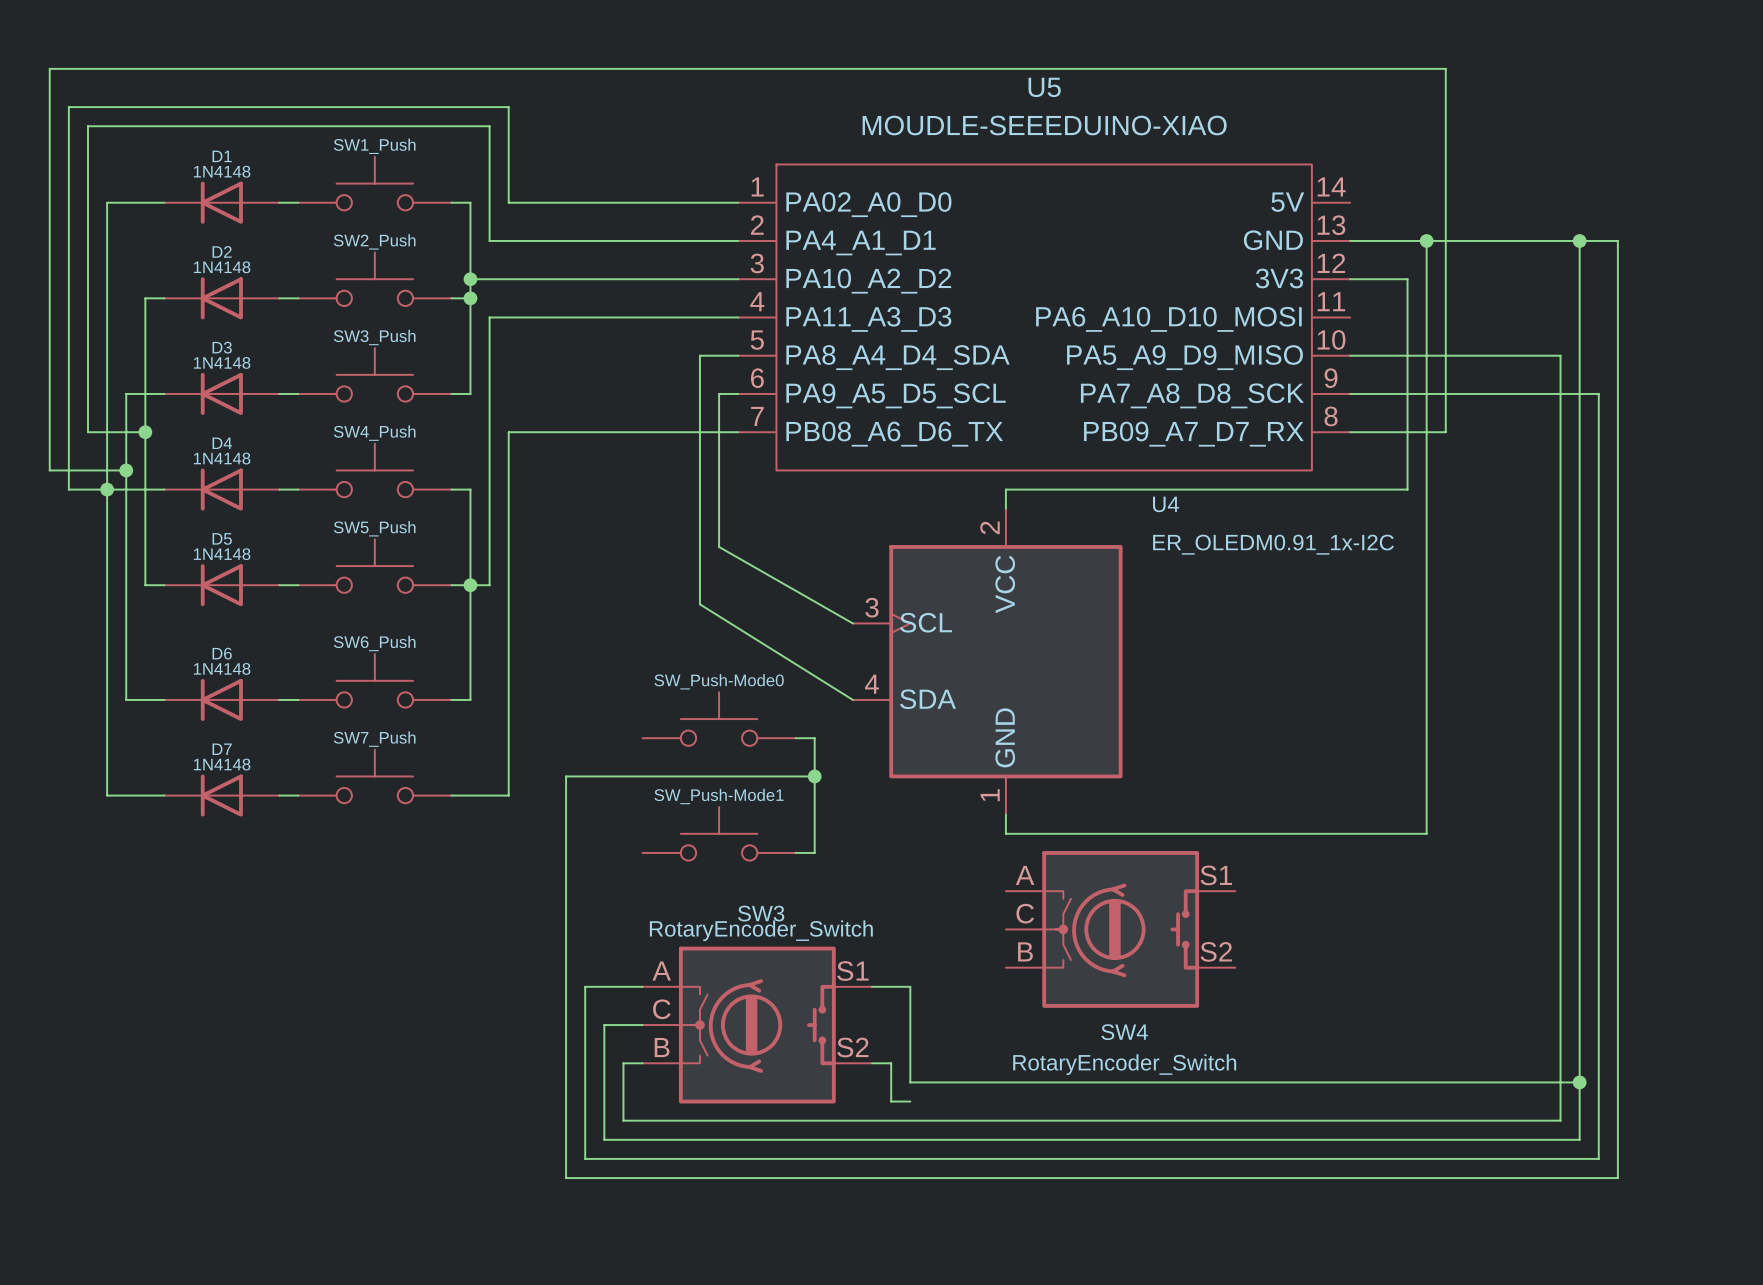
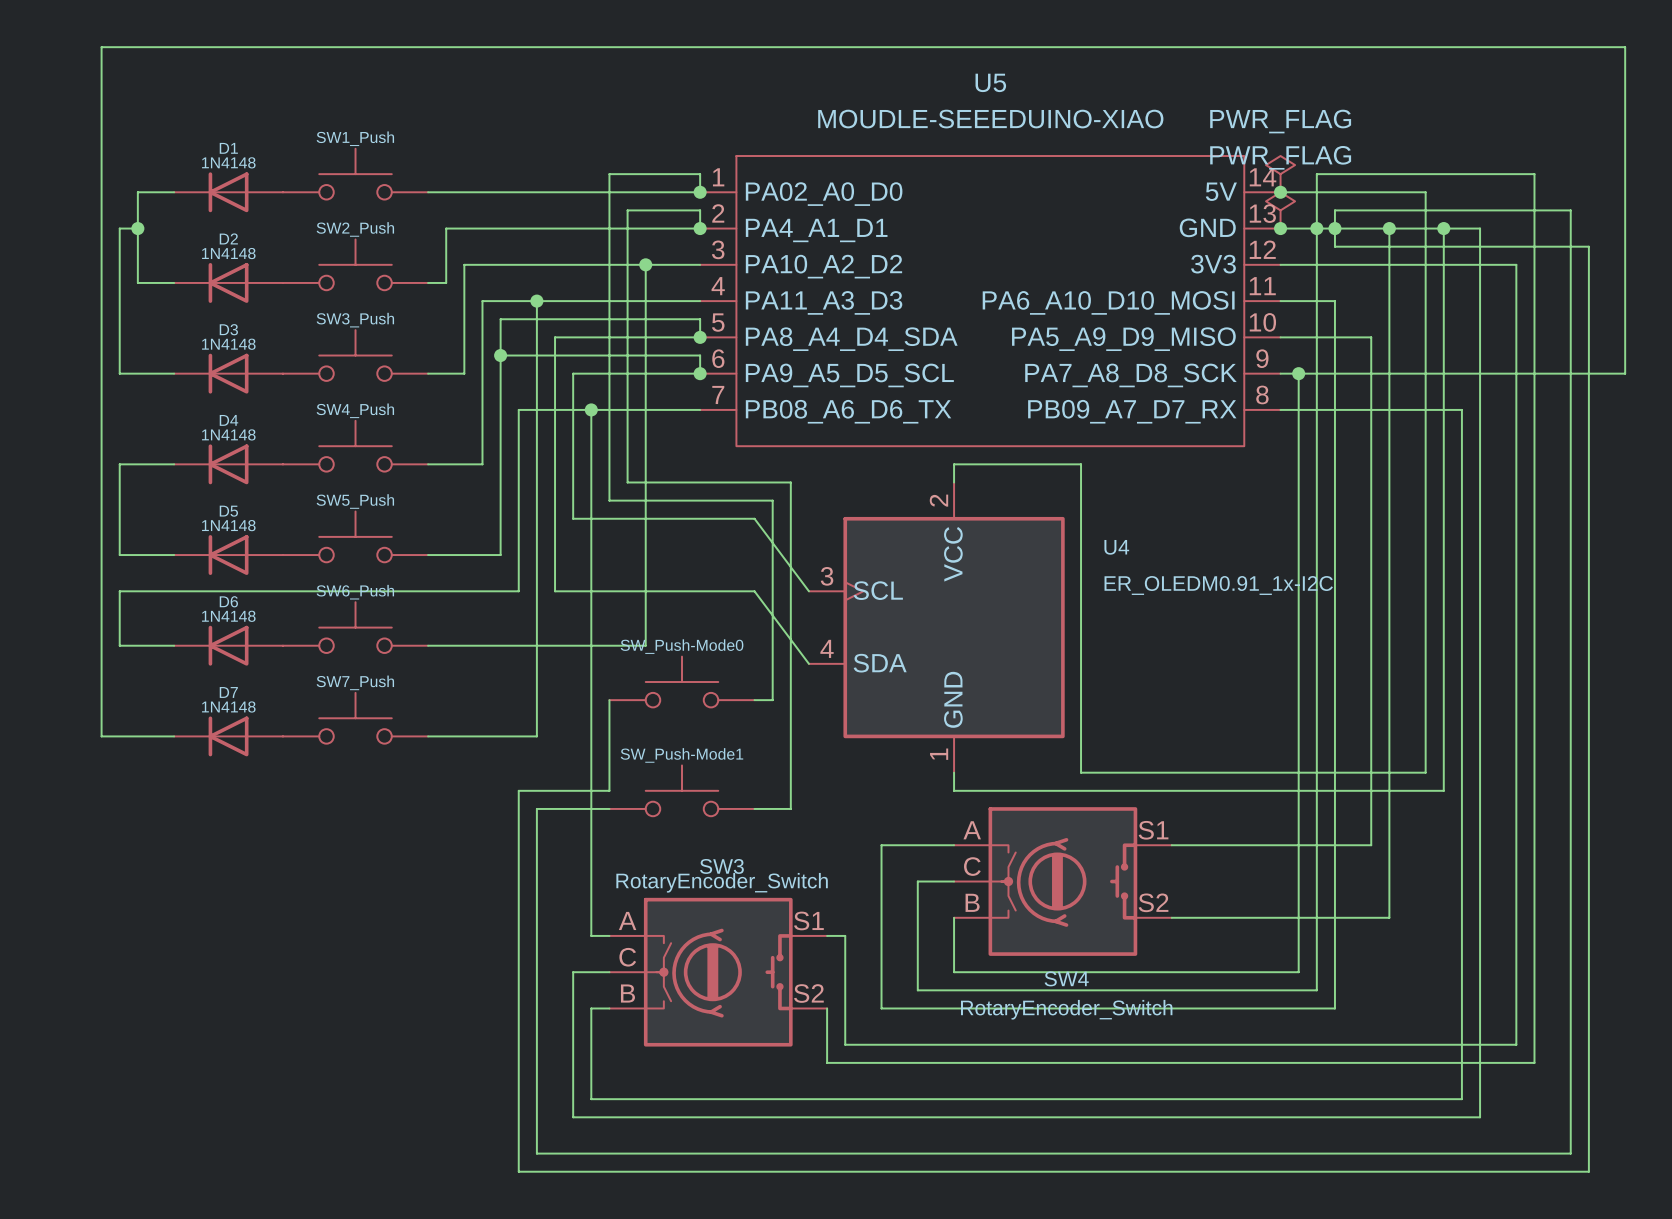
power symbol: none -> PWR_FLAG (1280, 174)
wire: (107, 202) (145, 202) -> (137, 282) (137, 192)
wire: none -> (101, 192) (101, 47) (1625, 47) (1625, 373) (1516, 373) (1516, 264) (1334, 264)
D1 position: (221, 202) -> (228, 192)
wire: (470, 202) (470, 240) -> (464, 228) (446, 228)
wire: none -> (446, 192) (482, 192)
wire: (508, 202) (508, 107) (68, 107) (68, 489) (126, 489) (126, 393) -> (137, 228) (119, 228) (119, 373)
wire: none -> (700, 192) (700, 174) (609, 174) (609, 500) (772, 500) (772, 700)
junction: none -> (700, 192)
junction: none -> (1280, 192)
power symbol: none -> PWR_FLAG (1280, 210)
junction: none -> (137, 228)
wire: (489, 240) (489, 126) (87, 126) (87, 432) (145, 432) -> none
junction: none -> (700, 228)
junction: none -> (1280, 228)
junction: none -> (1316, 228)
junction: none -> (1334, 228)
wire: (1426, 240) (1426, 833) -> (1443, 228) (1443, 790) (1353, 790)
junction: (1426, 240) -> none
wire: none -> (1389, 228) (1389, 917) (1171, 917)
junction: none -> (1389, 228)
junction: none -> (1443, 228)
wire: (1560, 240) (1617, 240) -> (1480, 228) (1480, 337)
wire: (1579, 240) (1579, 1139) (604, 1139) -> none
junction: (1579, 240) -> none
wire: none -> (1534, 228) (1534, 174) (1316, 174) (1316, 990) (917, 990) (917, 881) (954, 881)
wire: (470, 279) (489, 279) -> (464, 301) (464, 264)
junction: (470, 279) -> none
wire: none -> (645, 264) (645, 645) (428, 645)
junction: none -> (645, 264)
wire: (1407, 279) (1407, 317) -> (1280, 301) (1334, 301)
wire: (145, 298) (145, 585) -> none
D2 position: (221, 298) -> (228, 282)
wire: (470, 298) (470, 393) -> (464, 373) (446, 373)
junction: (470, 298) -> none
wire: (489, 317) (508, 317) -> (482, 409) (482, 301)
wire: none -> (536, 301) (536, 736) (428, 736)
junction: none -> (536, 301)
wire: (699, 355) (699, 604) (852, 699) -> (663, 337) (555, 337) (555, 591) (754, 591) (808, 663)
junction: none -> (700, 337)
wire: (1560, 355) (1445, 355) (1445, 68) (49, 68) (49, 470) (126, 470) -> none
wire: none -> (500, 355) (700, 355) (700, 373)
junction: none -> (500, 355)
D3 position: (221, 393) -> (228, 373)
wire: (489, 393) (489, 585) -> (700, 337) (700, 319) (500, 319) (500, 555) (464, 555)
wire: (719, 393) (719, 546) (852, 623) -> (682, 373) (573, 373) (573, 518) (754, 518) (808, 591)
junction: none -> (700, 373)
wire: none -> (1298, 373) (1298, 972) (954, 972) (954, 917)
junction: none -> (1298, 373)
junction: (145, 432) -> none
wire: (508, 432) (546, 432) -> (119, 591) (518, 591) (518, 409)
wire: none -> (591, 409) (591, 935)
junction: none -> (591, 409)
junction: (126, 470) -> none
junction: (107, 489) -> none
D4 position: (221, 489) -> (228, 464)
wire: (470, 489) (470, 699) (451, 699) -> (446, 464) (482, 464)
wire: (508, 489) (508, 795) (451, 795) -> none
wire: (1139, 489) (1407, 489) -> (1081, 464) (1081, 772) (1425, 772) (1425, 192) (1280, 192)
wire: none -> (1334, 464) (1334, 1008) (881, 1008) (881, 845) (954, 845)
U4 name position: U4 (1166, 504) -> U4 (1116, 547)
U4 value position: ER_OLEDM0.91_1x-I2C (1273, 544) -> ER_OLEDM0.91_1x-I2C (1218, 585)
wire: (126, 585) (126, 623) -> (119, 555) (137, 555)
D5 position: (221, 585) -> (228, 555)
junction: (470, 585) -> none
wire: (126, 680) (126, 699) (164, 699) -> (119, 645) (174, 645)
part position: (374, 680) -> (355, 627)
D6 position: (221, 699) -> (228, 645)
wire: (279, 699) (298, 699) -> none
wire: none -> (609, 700) (609, 790) (518, 790) (518, 1171) (1588, 1171) (1588, 246) (1334, 246) (1334, 210) (1570, 210) (1570, 1153) (536, 1153) (536, 1117)
wire: (814, 738) (814, 852) -> (700, 228) (700, 210) (627, 210) (627, 482) (790, 482) (790, 808) (772, 808)
wire: (107, 776) (107, 795) (164, 795) -> (101, 736) (174, 736)
part position: (374, 776) -> (355, 718)
wire: (814, 776) (566, 776) (566, 852) -> (609, 808) (536, 808)
junction: (814, 776) -> none
D7 position: (221, 795) -> (228, 736)
wire: (279, 795) (298, 795) -> none
wire: (623, 986) (585, 986) (585, 1158) (623, 1158) -> (591, 1062) (591, 1099)
wire: (891, 986) (910, 986) (910, 1082) (1579, 1082) -> (845, 935) (845, 1008)
wire: (872, 1063) (891, 1063) -> (827, 1008) (827, 1062)
junction: (1579, 1082) -> none
wire: none -> (863, 1044) (1516, 1044)
wire: (1598, 1101) (1598, 1158) (1541, 1158) -> (1171, 845) (1371, 845) (1371, 409) (1461, 409) (1461, 1099)
wire: (623, 1120) (872, 1120) -> none
wire: (1617, 1120) (1617, 1178) (1560, 1178) -> (1534, 1062) (1480, 1062) (1480, 1117)
wire: (566, 1178) (604, 1178) -> (573, 1081) (573, 1117)

